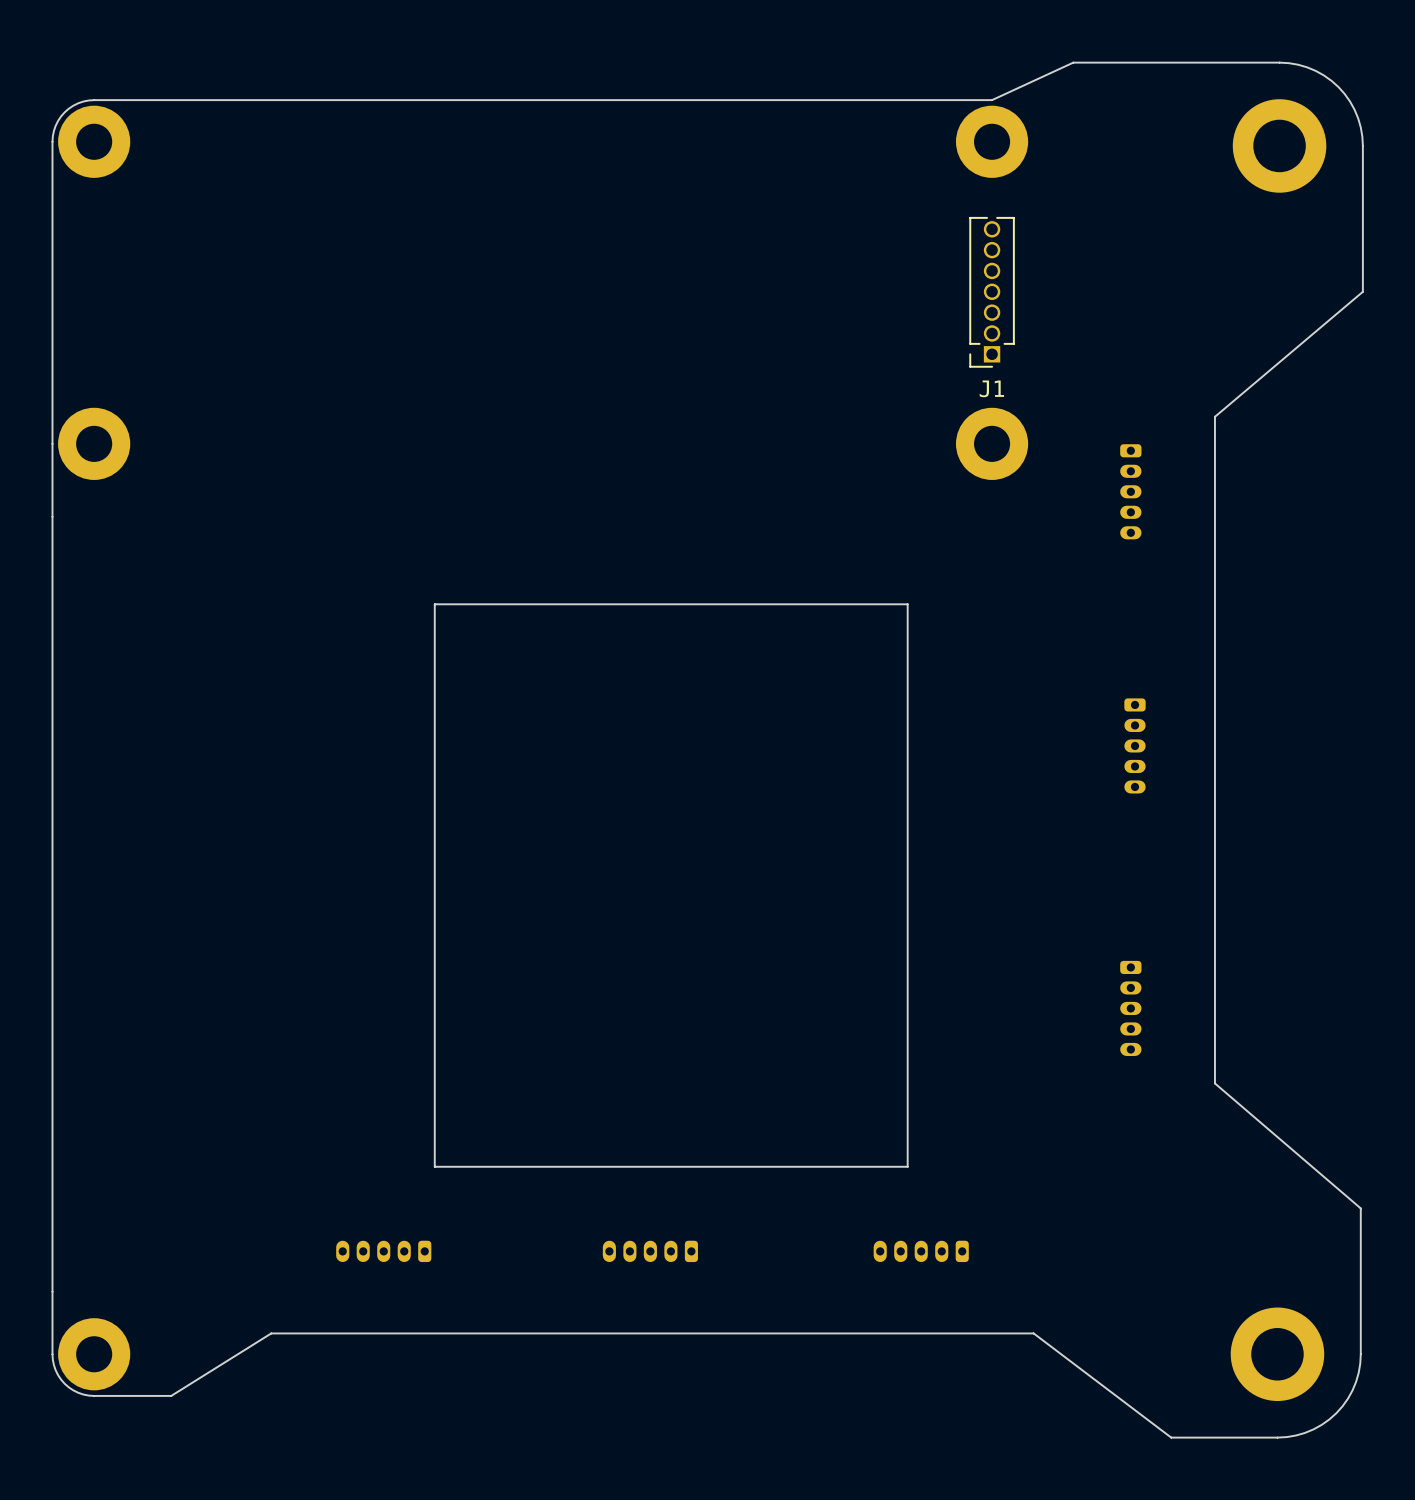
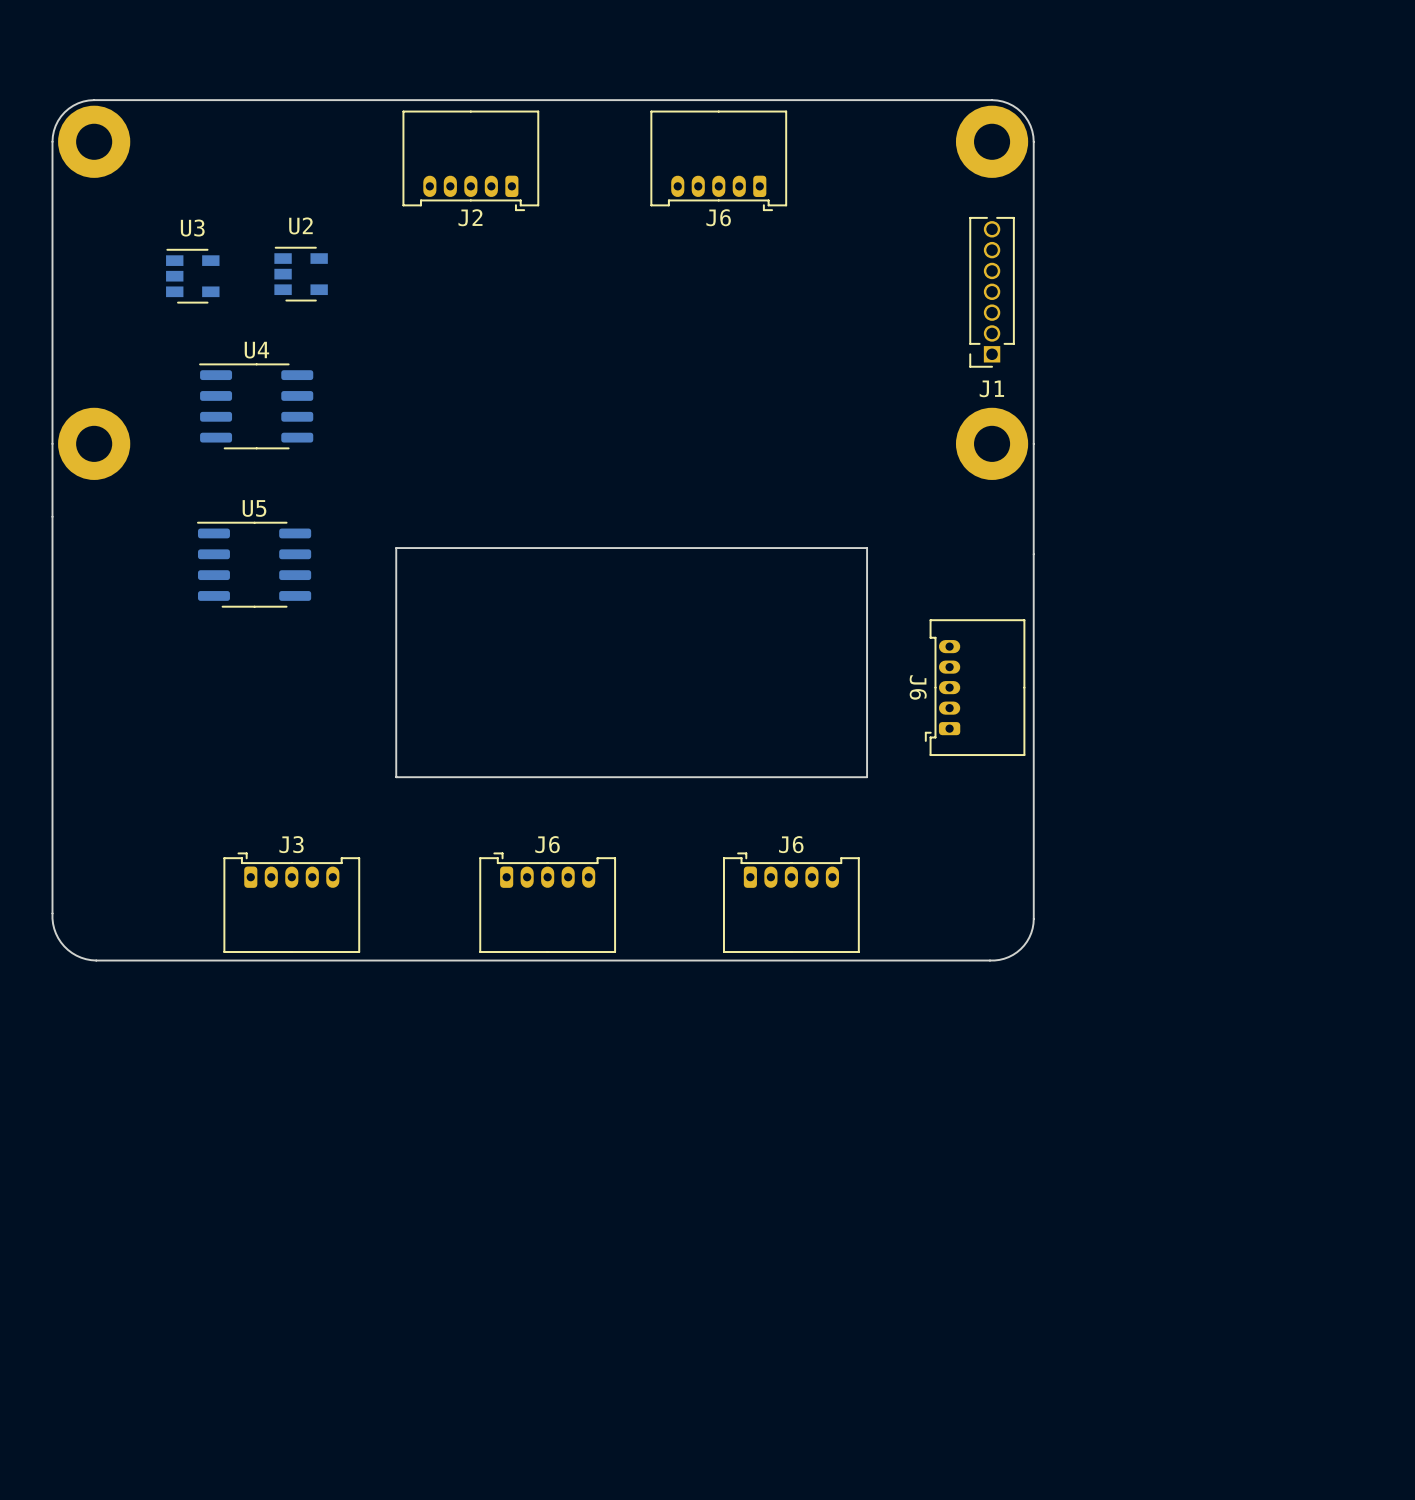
board edge: (992, 100) (1073, 62) (1288, 63) (1307, 67) (1331, 80) (1350, 101) (1360, 127) (1362, 145) (1362, 291) (1214, 416) (1214, 1083) (1360, 1208) (1360, 1363) (1352, 1390) (1342, 1406) (1329, 1419) (1304, 1432) (1286, 1437) (1171, 1437) (1033, 1333) (271, 1333) (171, 1395) (94, 1395) (78, 1392) (61, 1379) (53, 1365) (52, 1354) (52, 913) -> (992, 100) (1008, 103) (1021, 112) (1030, 125) (1033, 141) (1033, 918) (1031, 933) (1020, 949) (1008, 957) (994, 960) (96, 960) (76, 955) (64, 946) (55, 933) (52, 913)
part: (1279, 145) -> none
J2: none -> (470, 160)
J6: none -> (718, 160)
U2: none -> (301, 274)
U3: none -> (192, 276)
U4: none -> (256, 406)
part: (1130, 491) -> none
board edge: none -> (867, 548) (396, 548) (396, 777) (867, 777) (867, 548)
U5: none -> (254, 564)
board edge: (907, 604) (434, 604) (434, 1166) (907, 1166) (907, 604) -> none
J6: none -> (975, 687)
part: (1135, 745) -> none
J3: none -> (291, 902)
J6: none -> (547, 902)
J6: none -> (791, 902)
part: (1130, 1008) -> none
part: (383, 1251) -> none
part: (650, 1251) -> none
part: (921, 1251) -> none
part: (94, 1354) -> none
part: (1277, 1354) -> none

